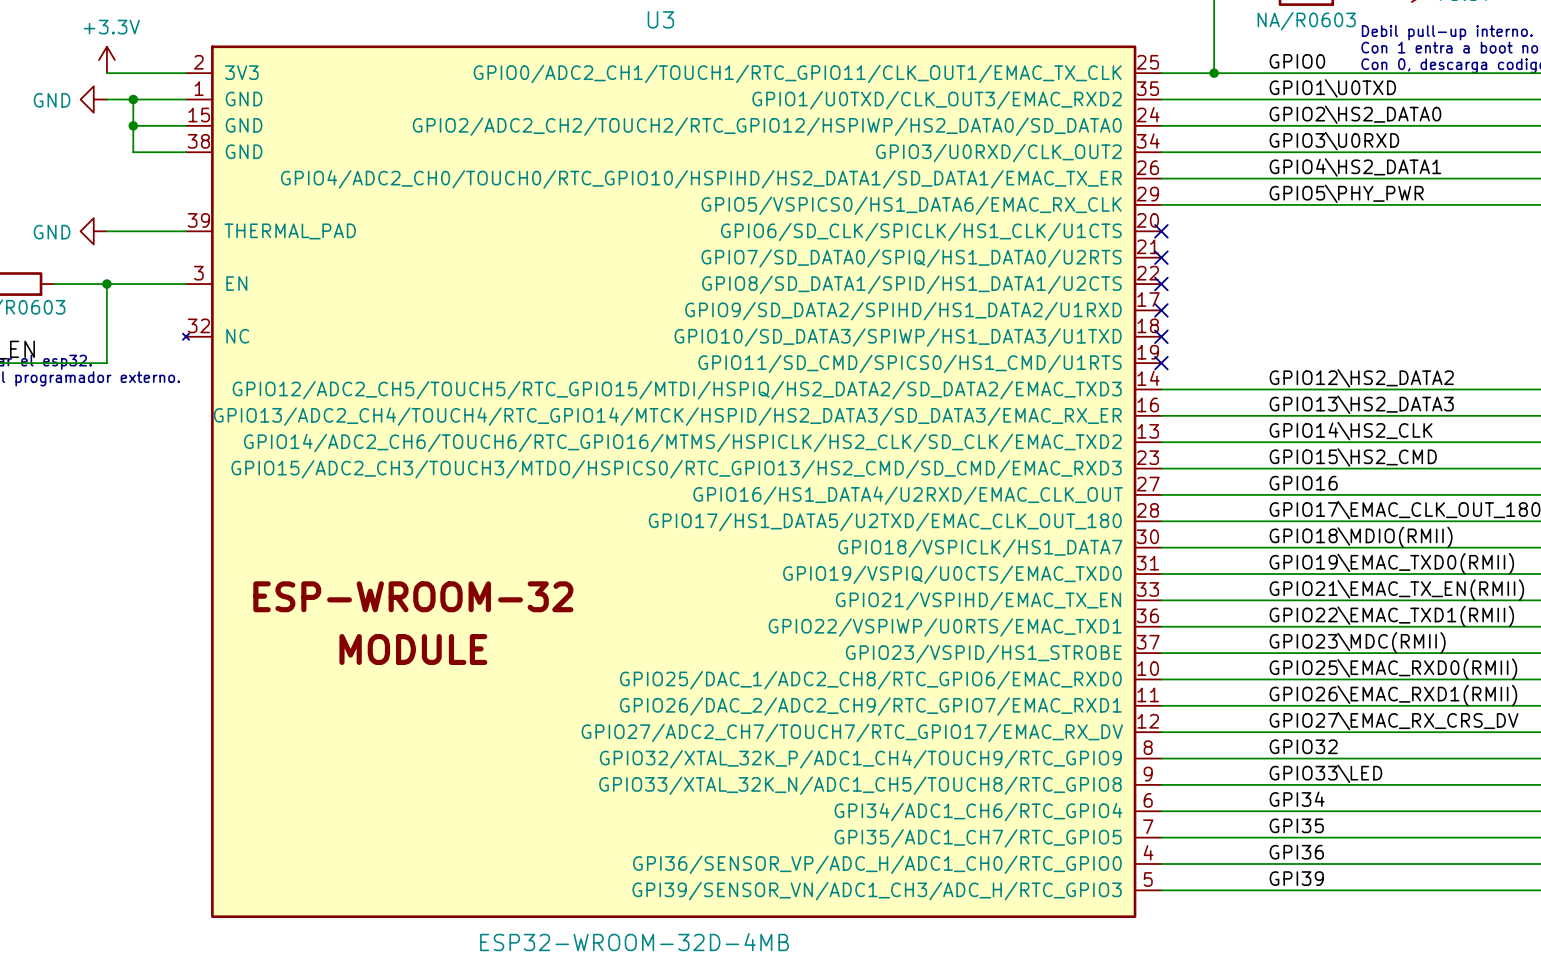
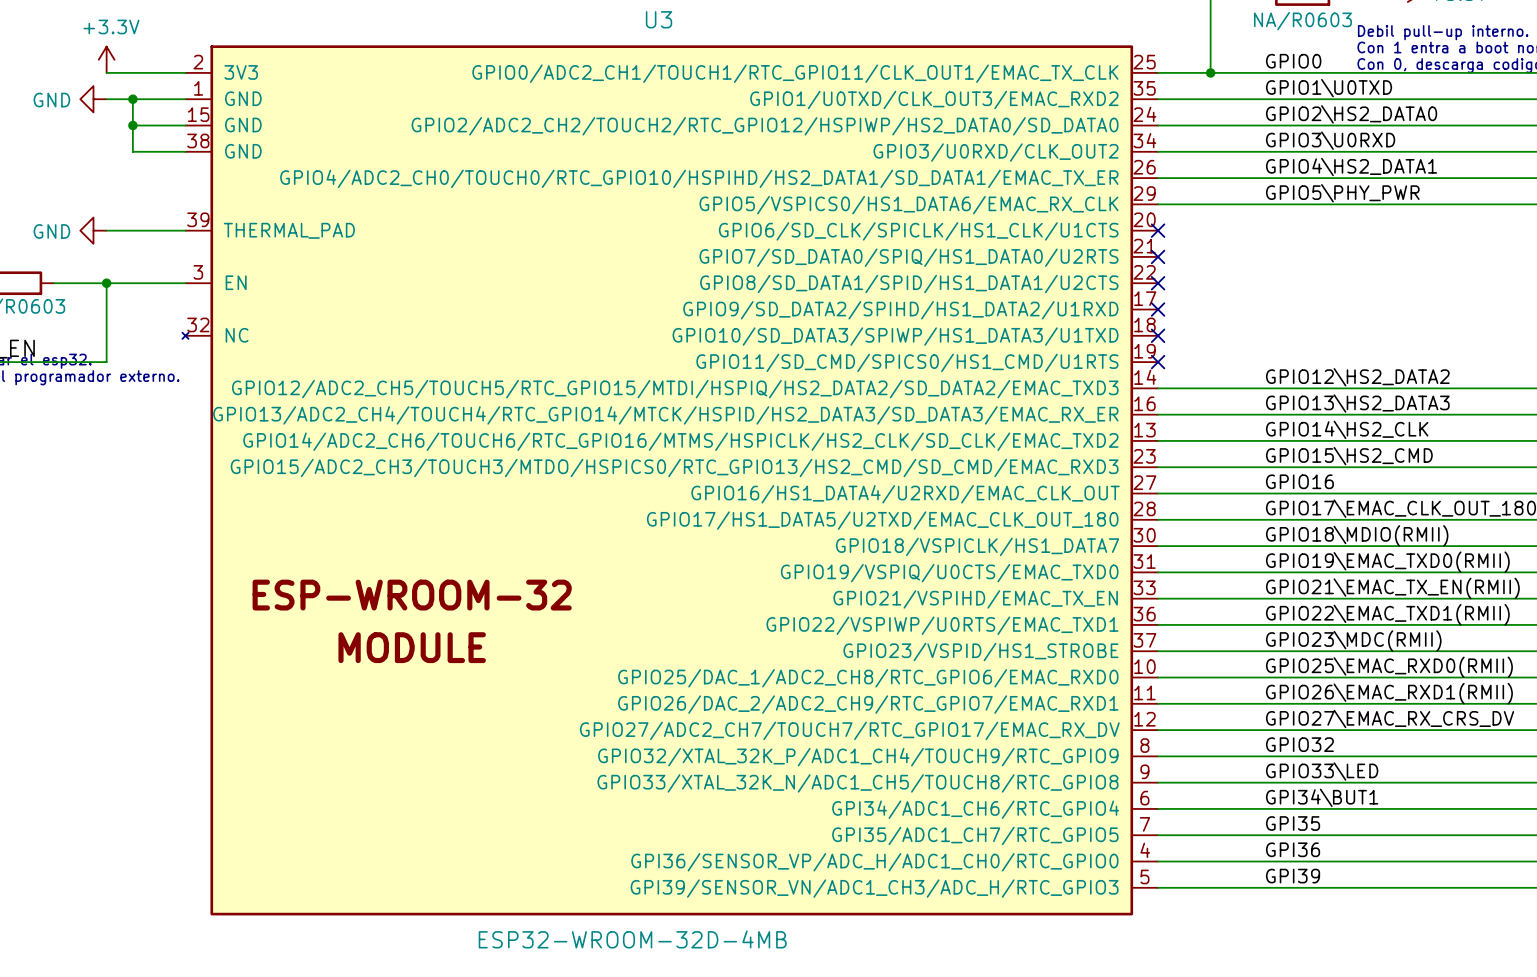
label: GPI34 (1297, 799) -> GPI34\BUT1 (1322, 797)

